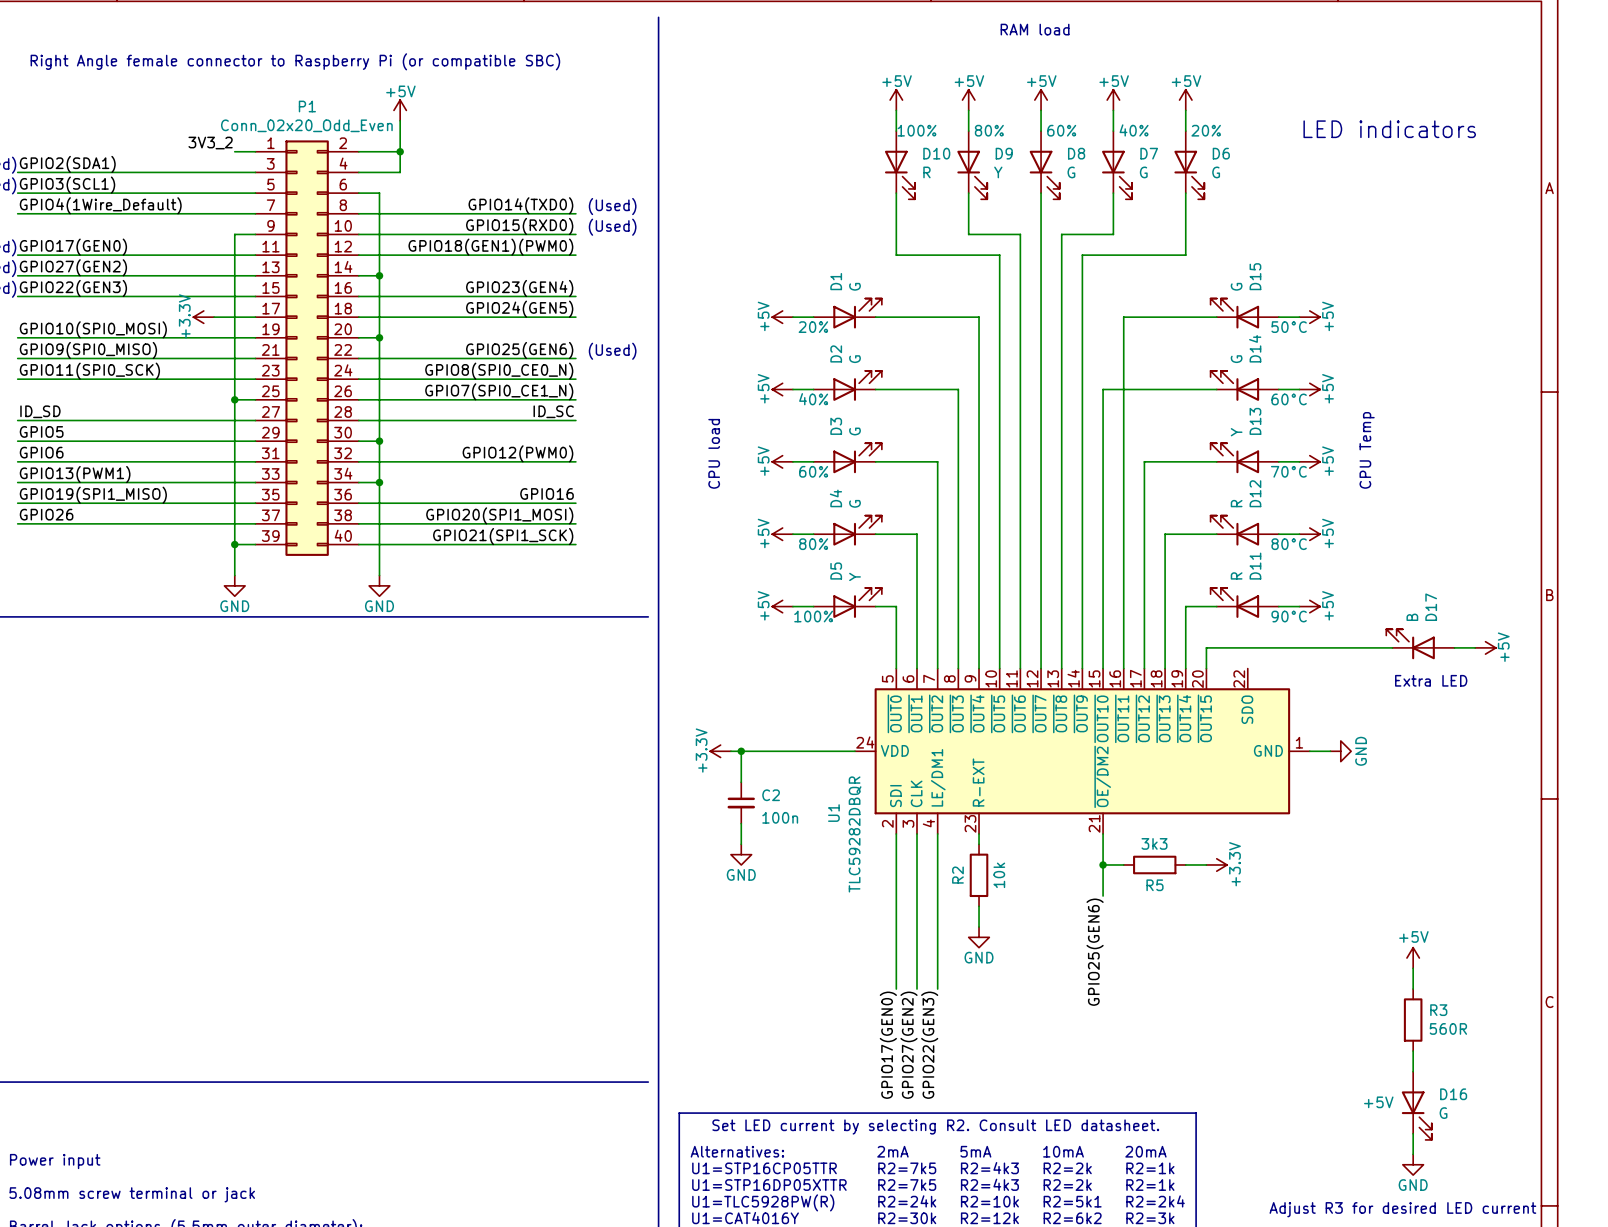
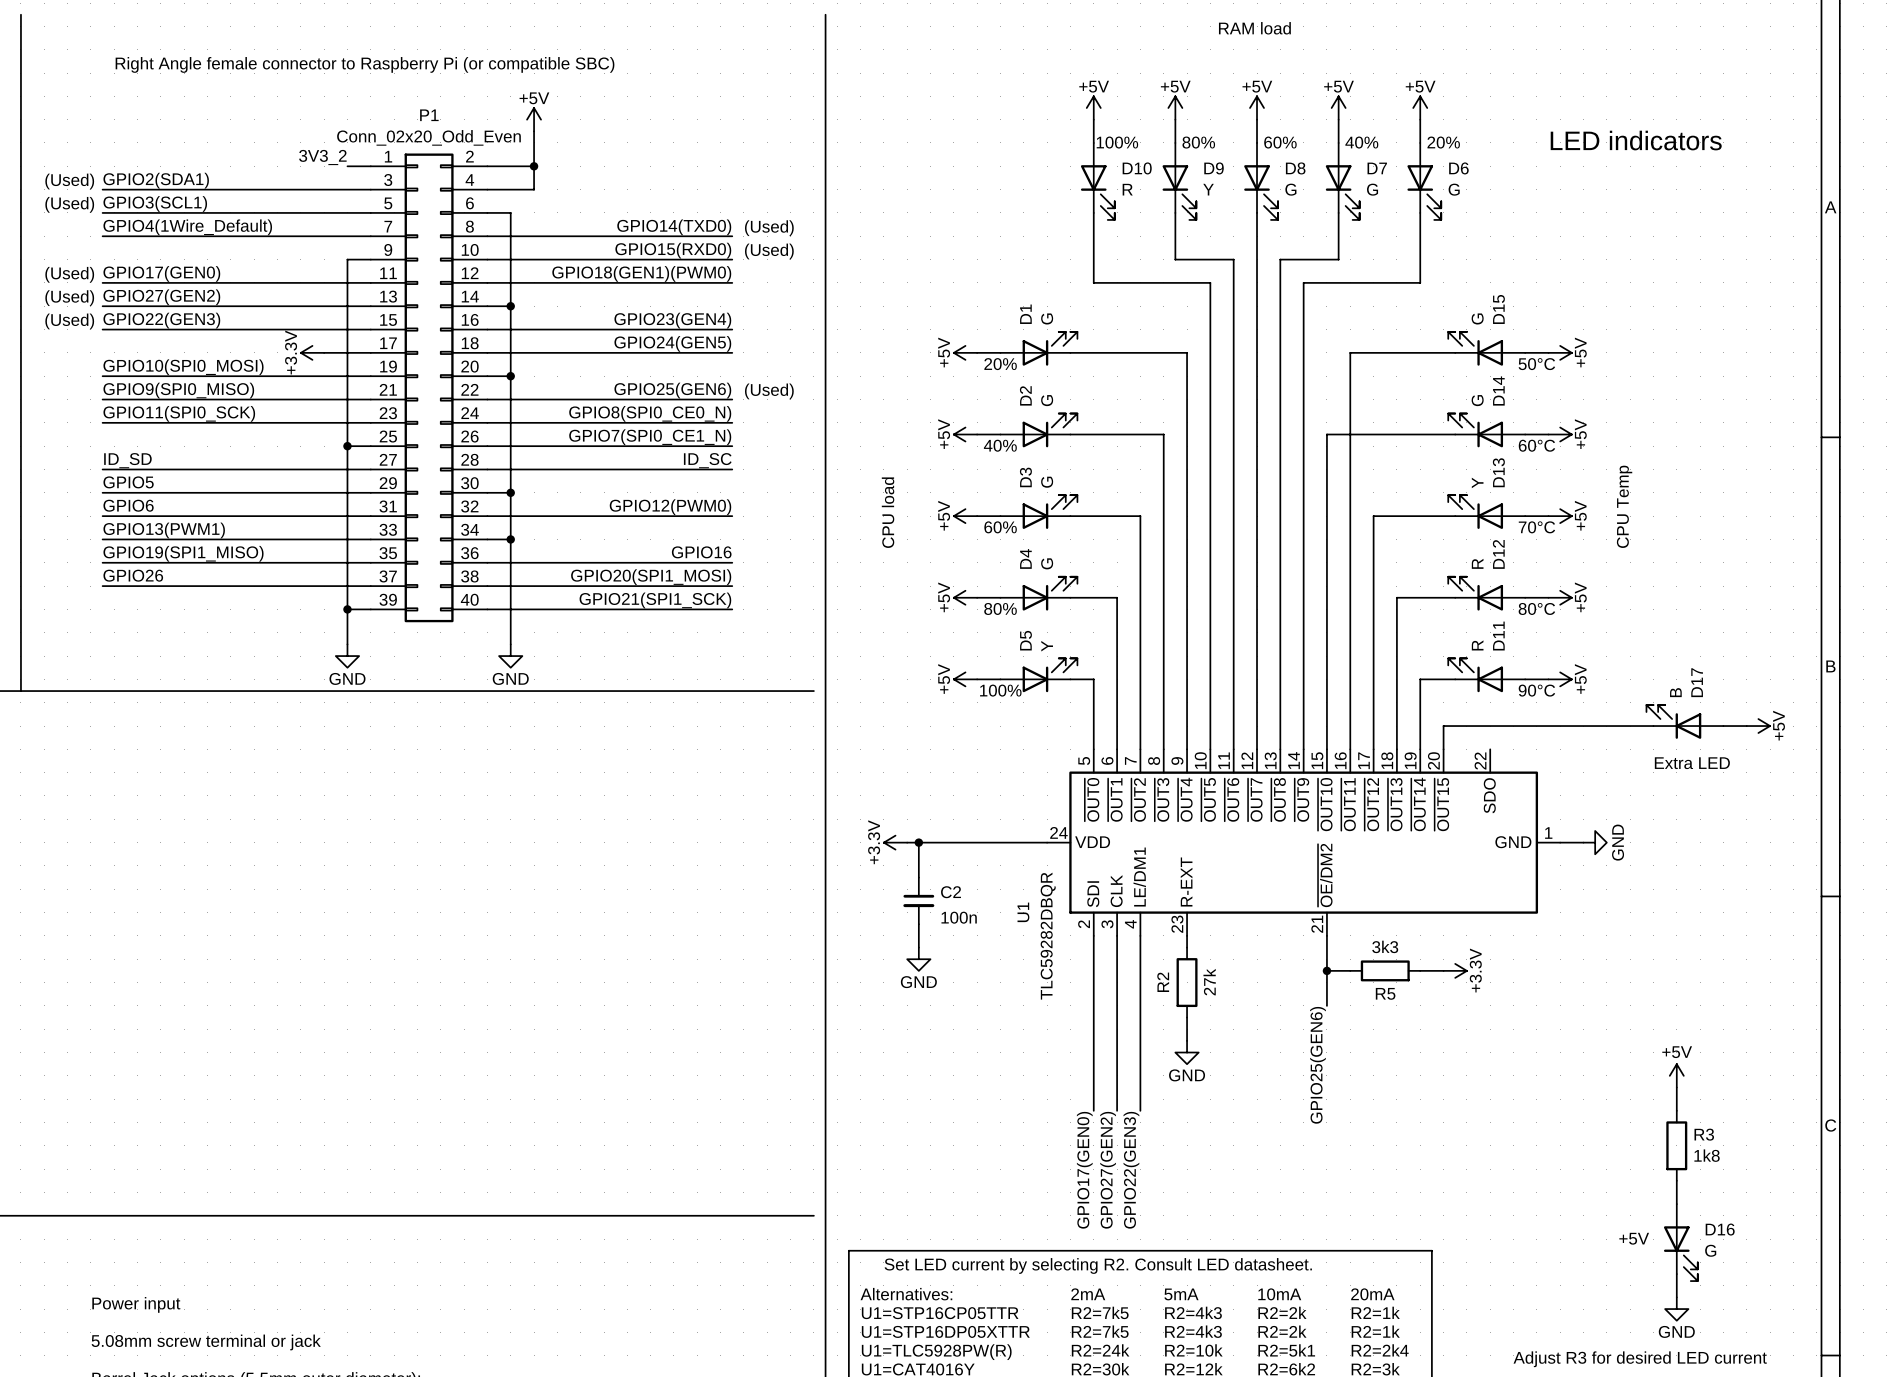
R2 value: 10k (999, 875) -> 27k (1209, 982)
R3 value: 560R (1448, 1028) -> 1k8 (1707, 1155)

